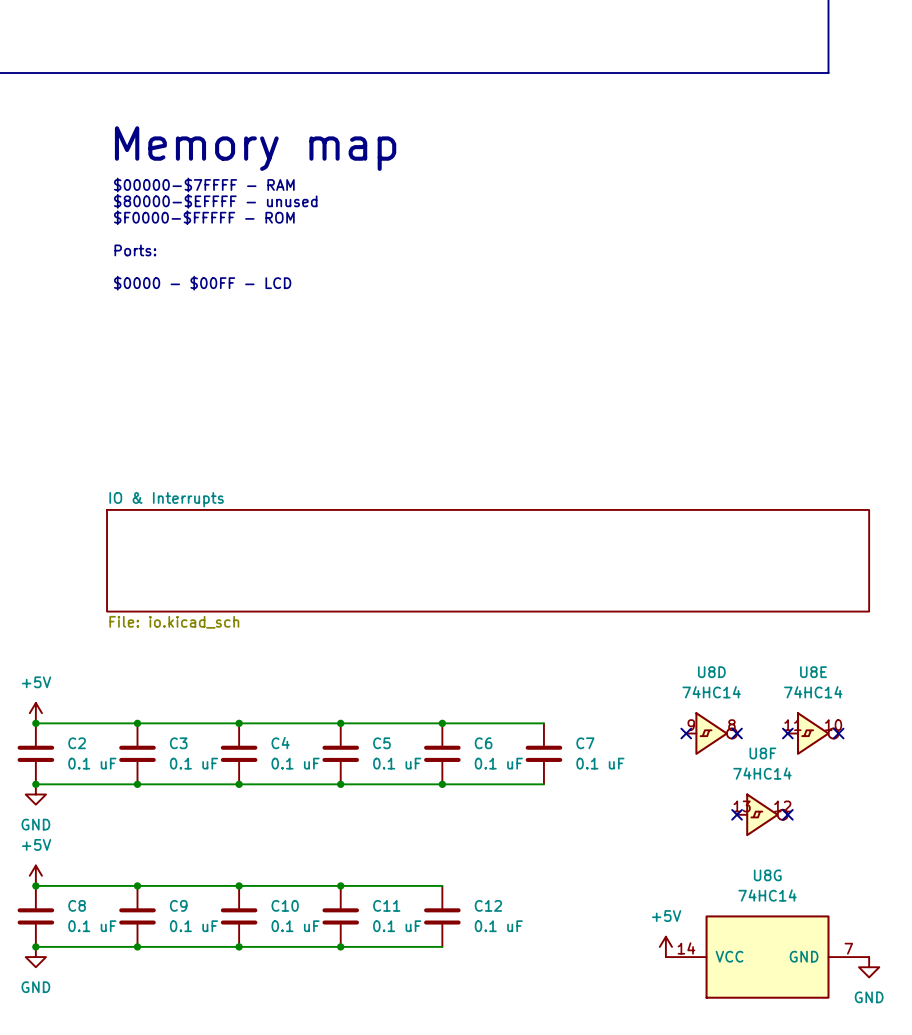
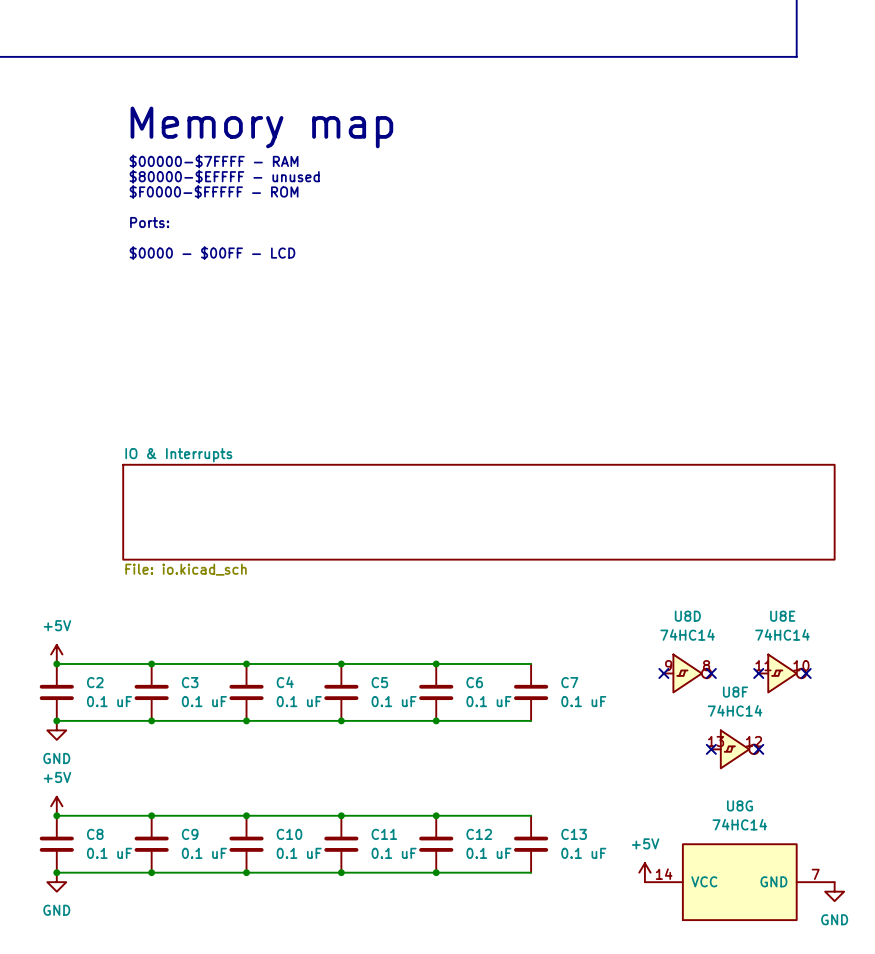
wire: none -> (436, 815) (531, 815)
junction: none -> (436, 815)
C13: none -> 0.1 uF (531, 844)
wire: none -> (436, 872) (531, 872)
junction: none -> (436, 872)

